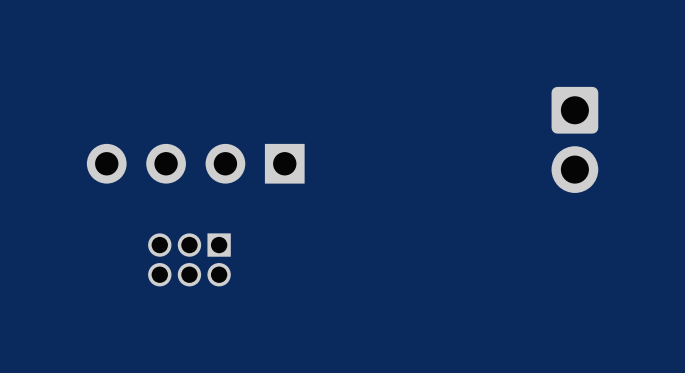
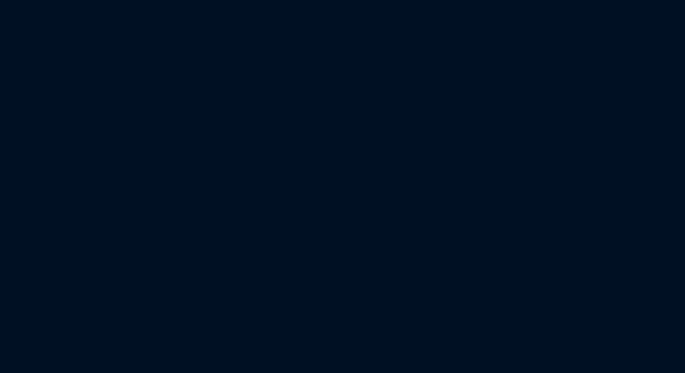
part: (574, 139) -> none
part: (195, 163) -> none
part: (189, 259) -> none

